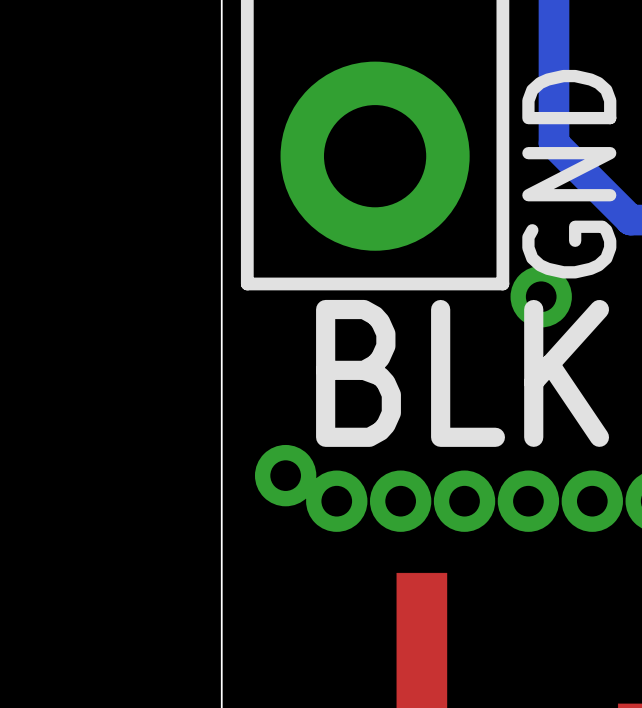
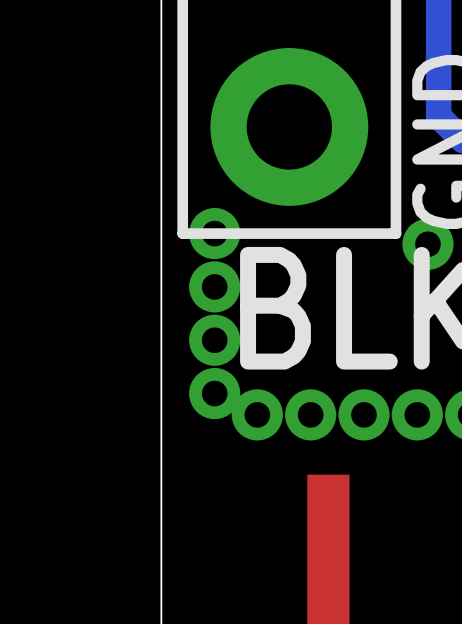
via: none -> (214, 233)
via: none -> (214, 286)
via: none -> (214, 340)

